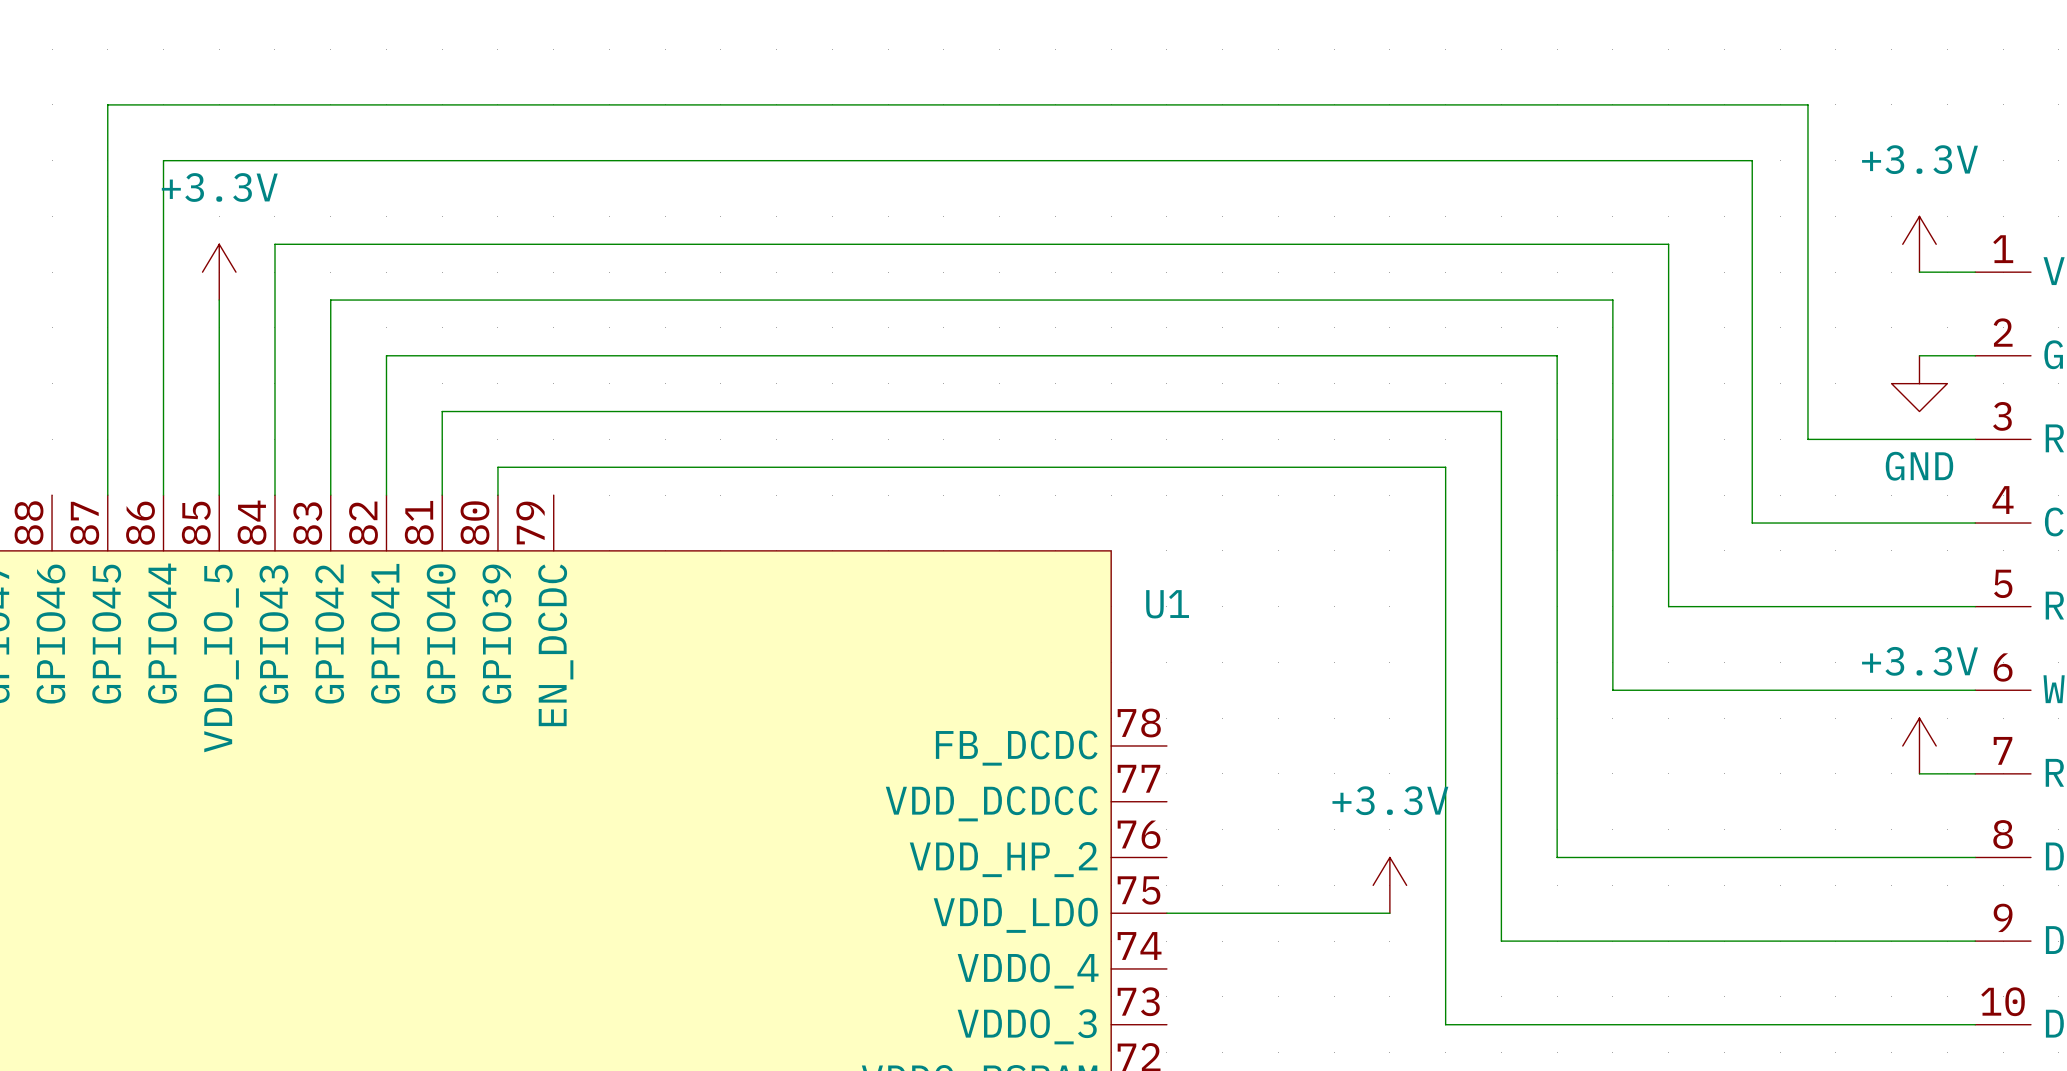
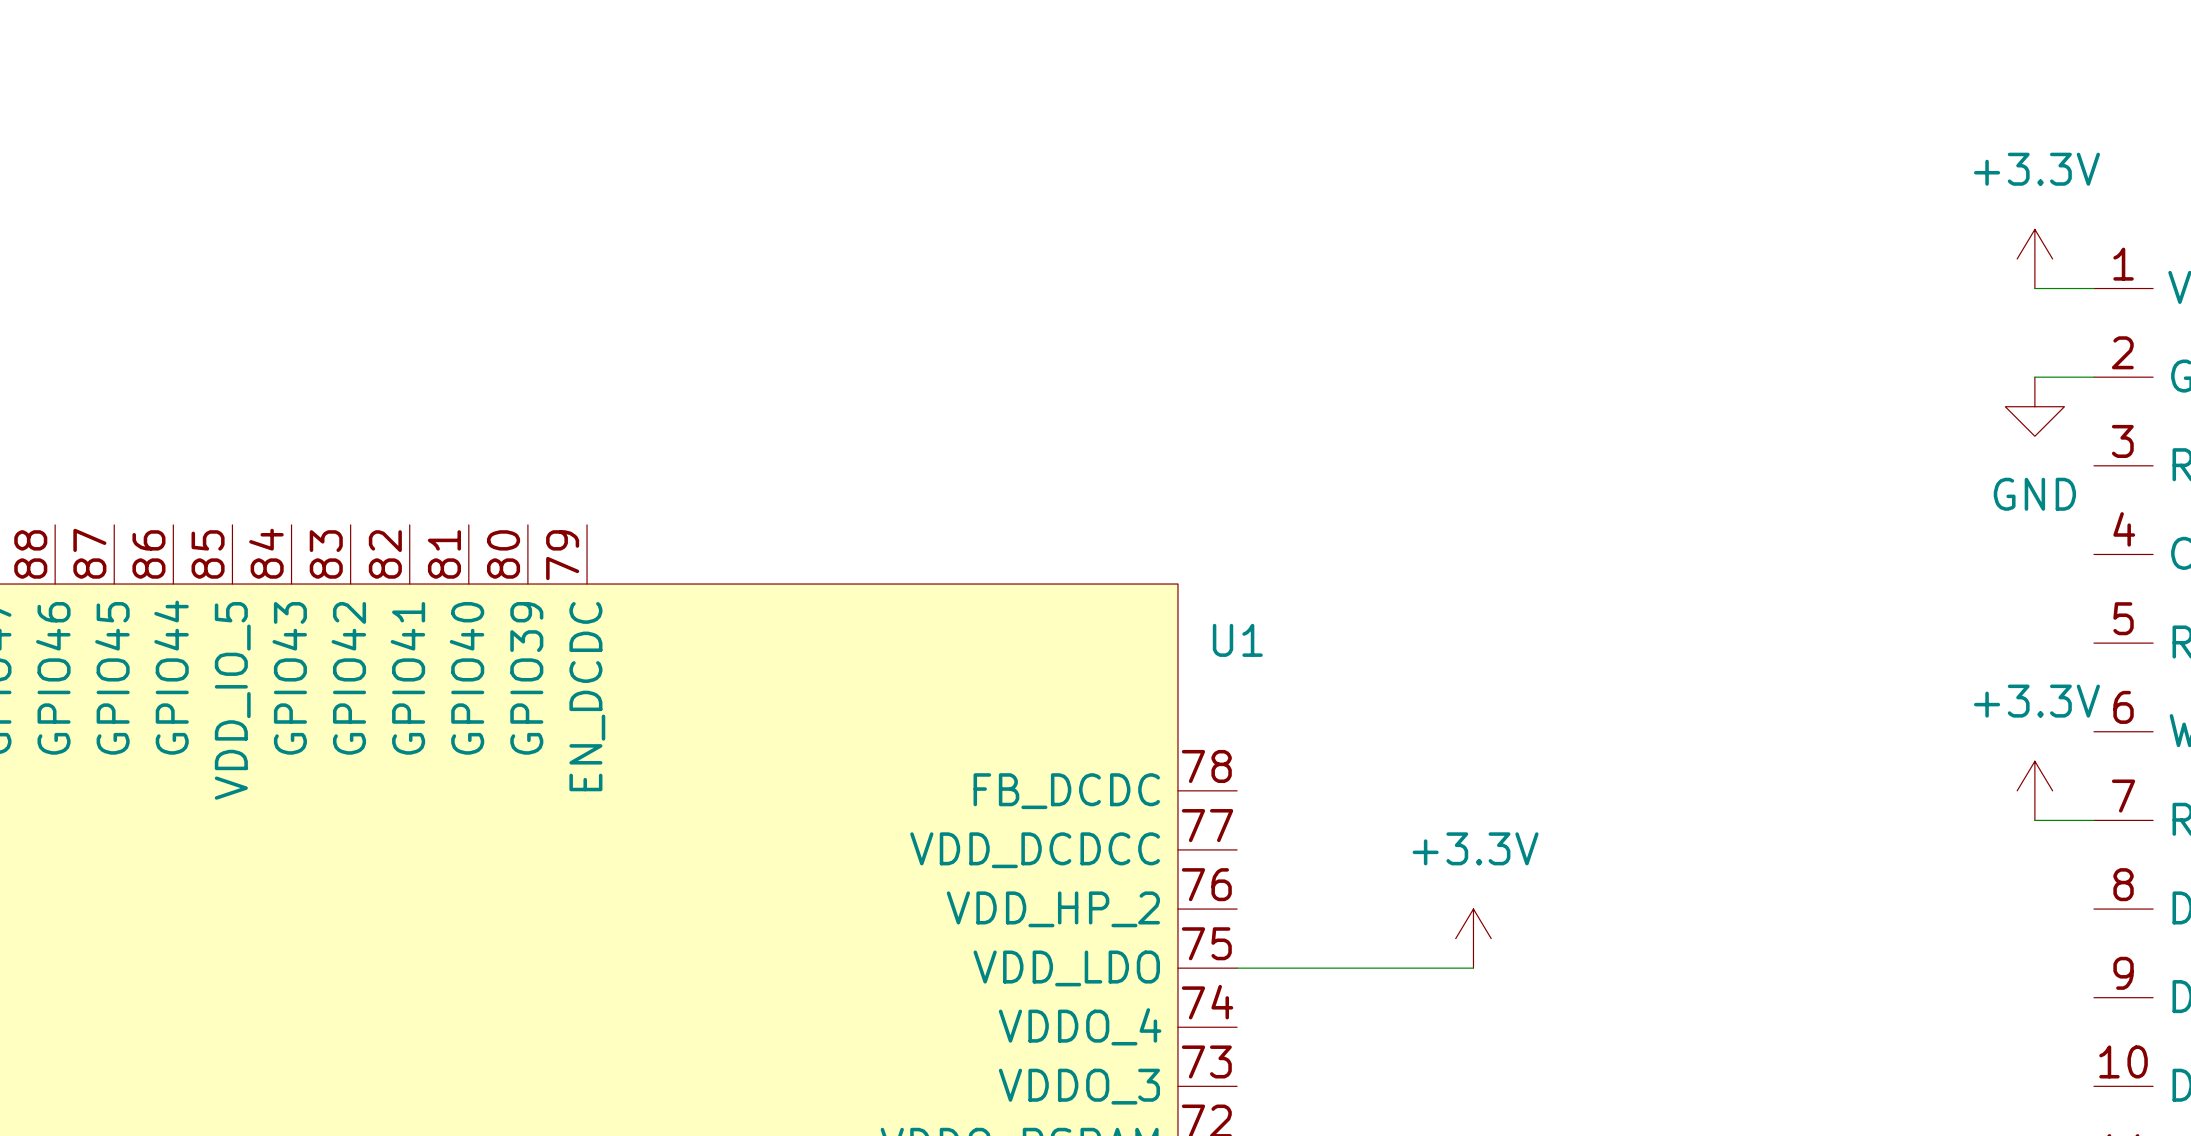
power symbol: +3.3V (219, 272) -> none
wire: (219, 300) (219, 495) -> none
wire: (1975, 439) (1807, 439) (1807, 104) (107, 104) (107, 495) -> none
wire: (163, 495) (163, 160) (1752, 160) (1752, 523) (1975, 523) -> none
wire: (274, 495) (274, 244) (1668, 244) (1668, 606) (1975, 606) -> none
wire: (330, 495) (330, 300) (1612, 300) (1612, 690) (1975, 690) -> none
wire: (386, 495) (386, 355) (1557, 355) (1557, 857) (1975, 857) -> none
wire: (442, 495) (442, 411) (1501, 411) (1501, 941) (1975, 941) -> none
wire: (497, 495) (497, 467) (1445, 467) (1445, 1024) (1975, 1024) -> none

